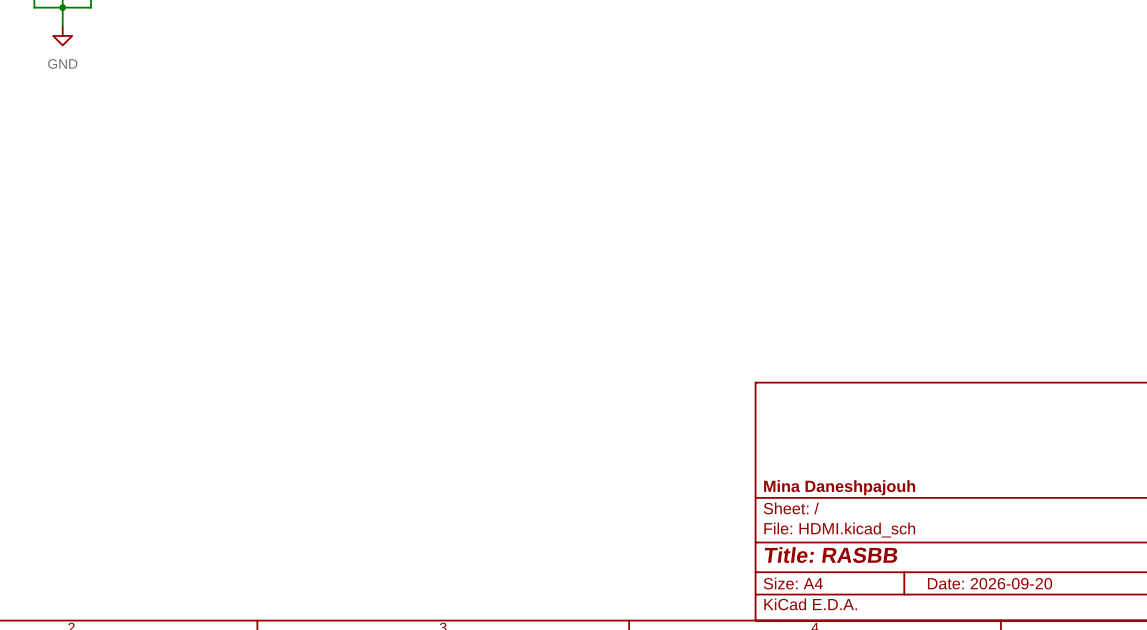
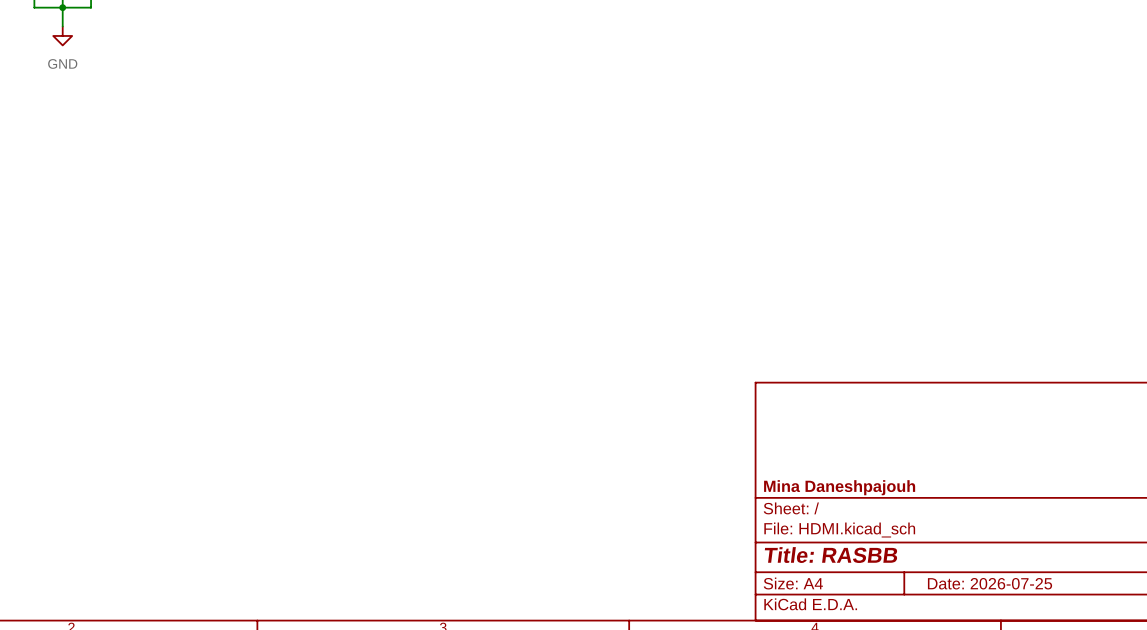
title block: Date: 2026-09-20 (990, 583) -> Date: 2026-07-25 (990, 583)

